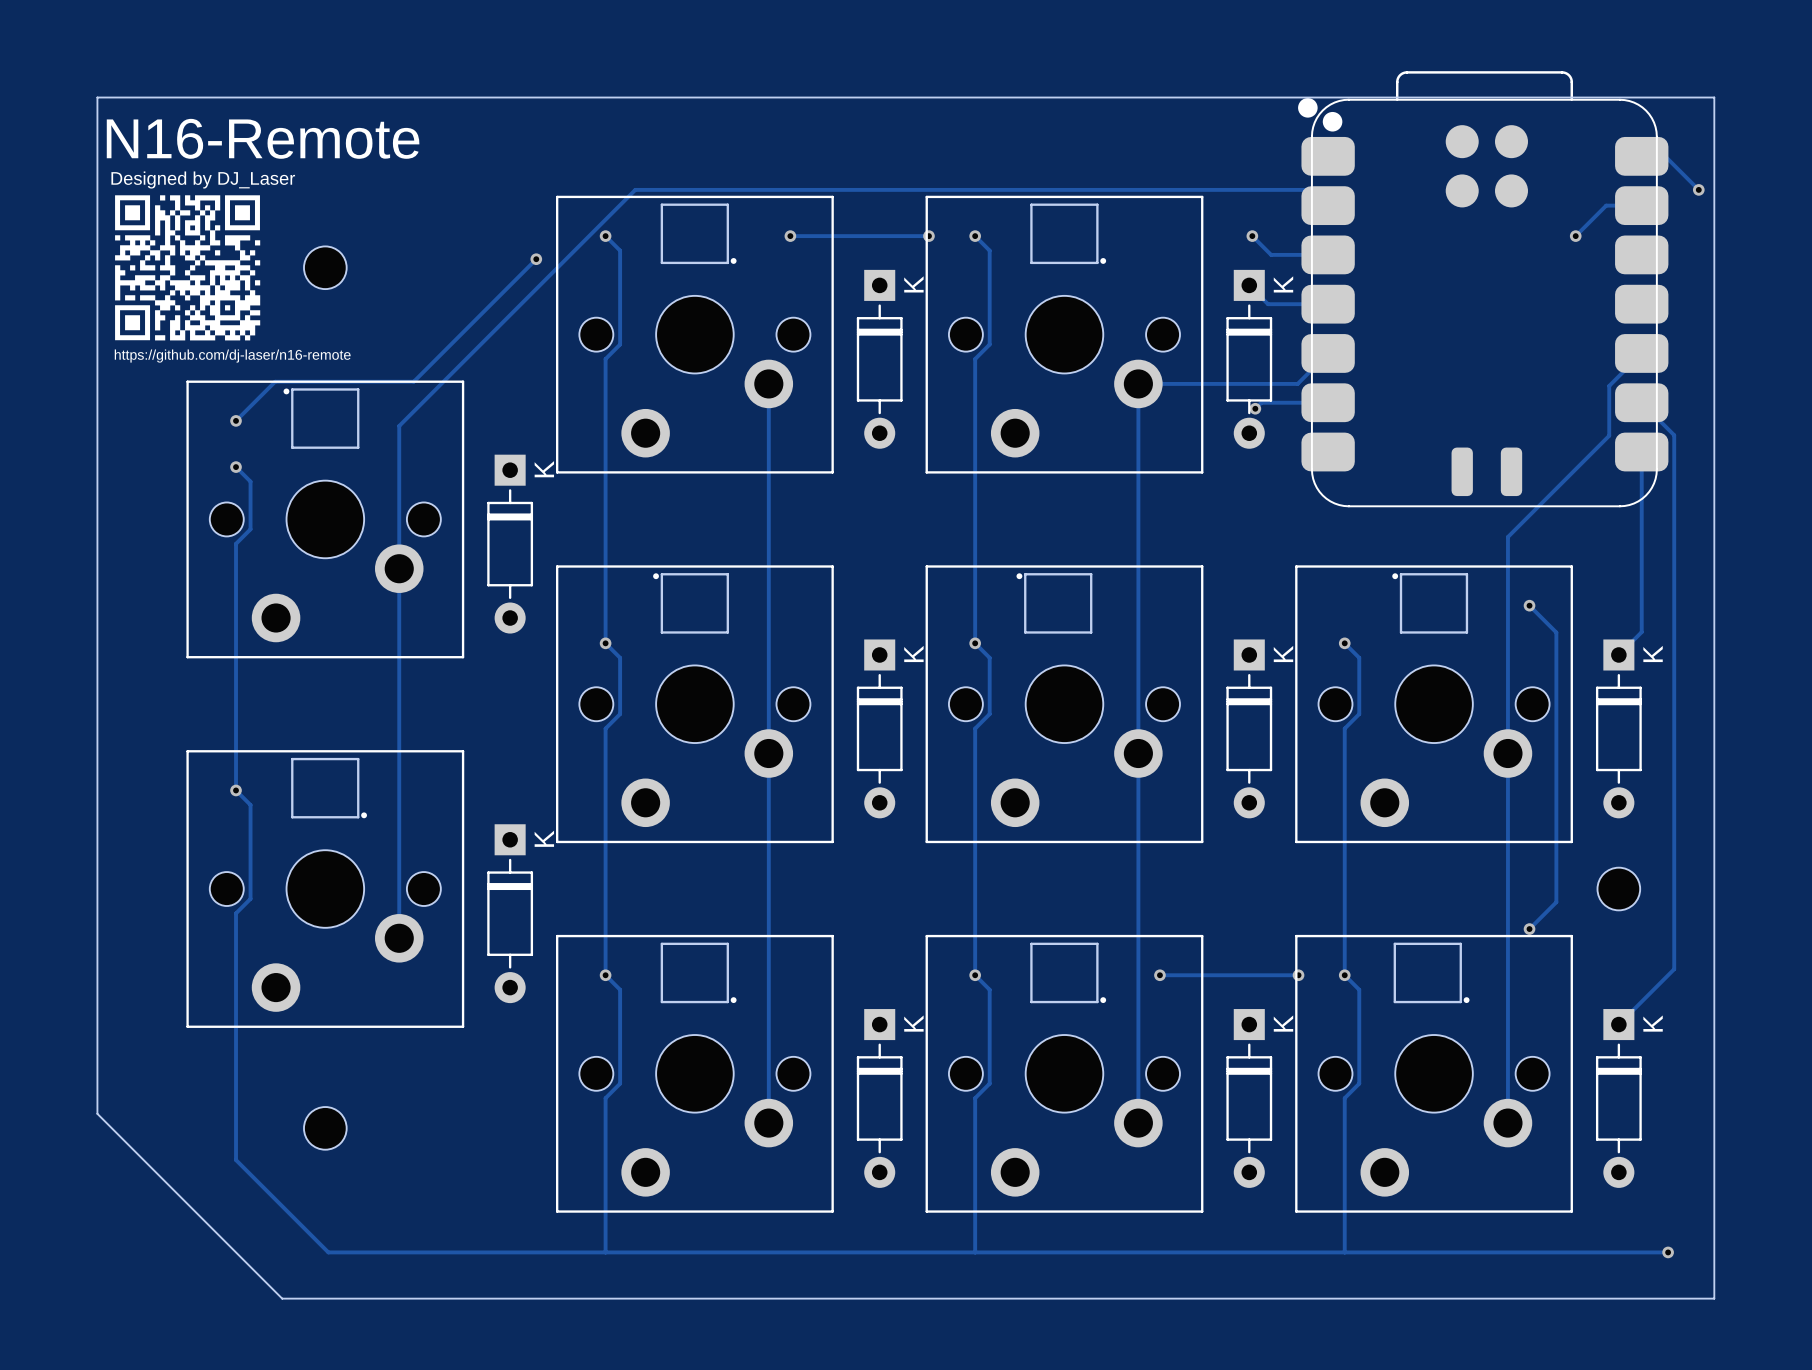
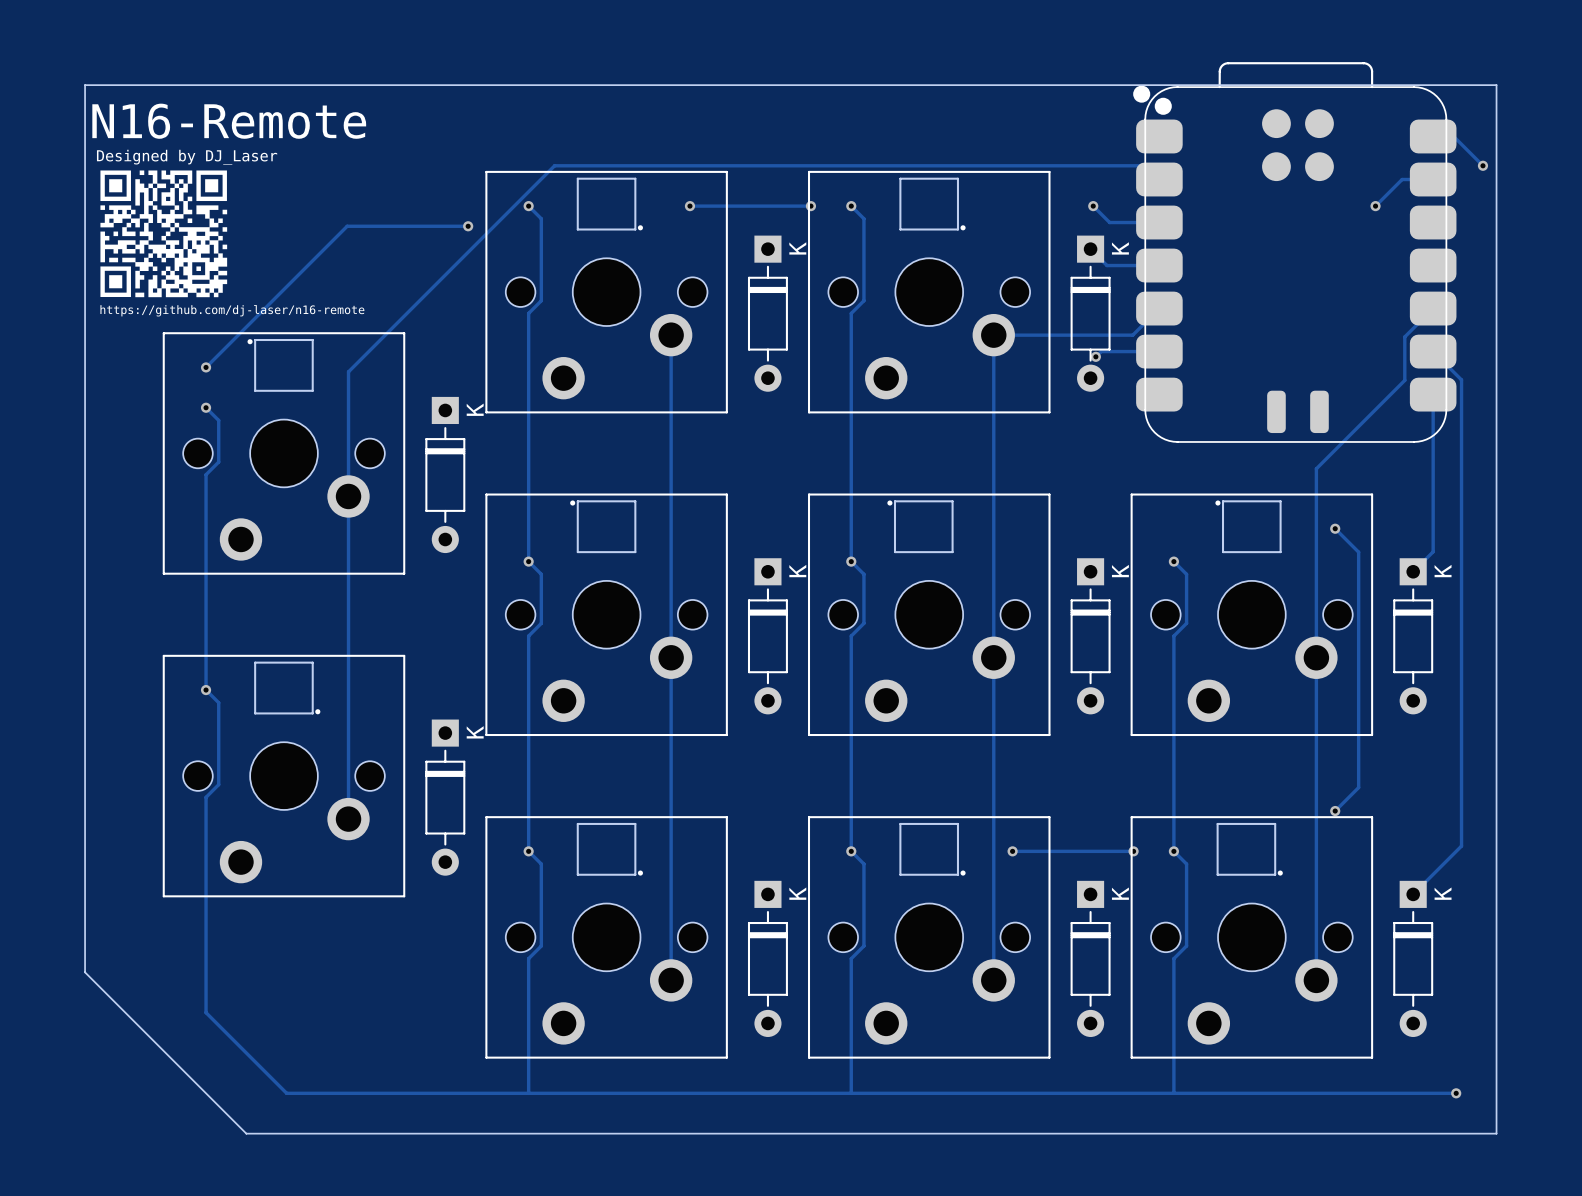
track: (536, 259) (413, 381) (275, 381) -> (468, 226) (347, 226) (240, 333)
part: (325, 267) -> none
part: (1618, 889) -> none
part: (325, 1128) -> none

